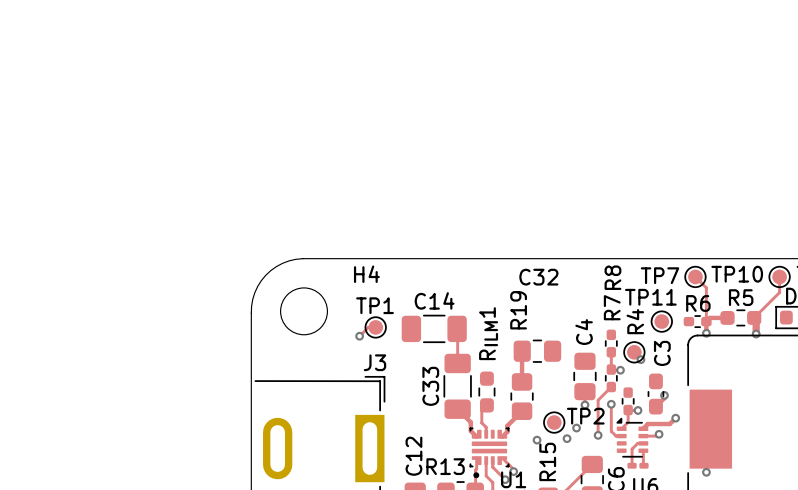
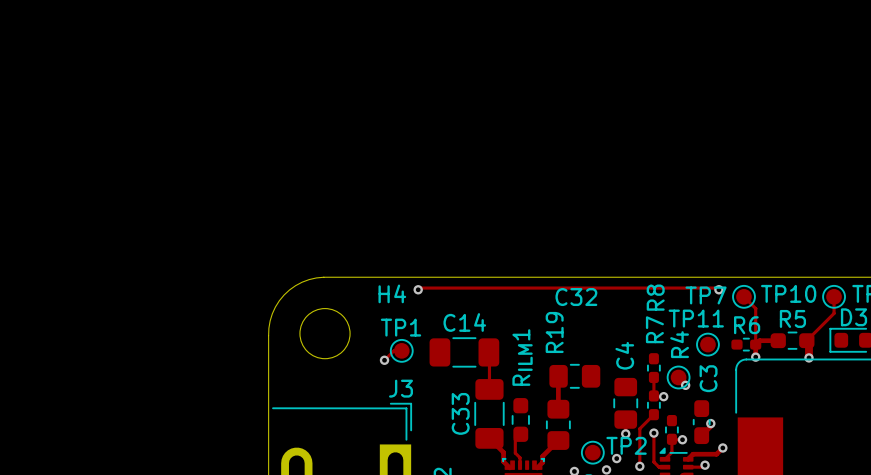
track: none -> (418, 289) (419, 288) (717, 288) (718, 289)
via: none -> (418, 289)
via: none -> (718, 289)

